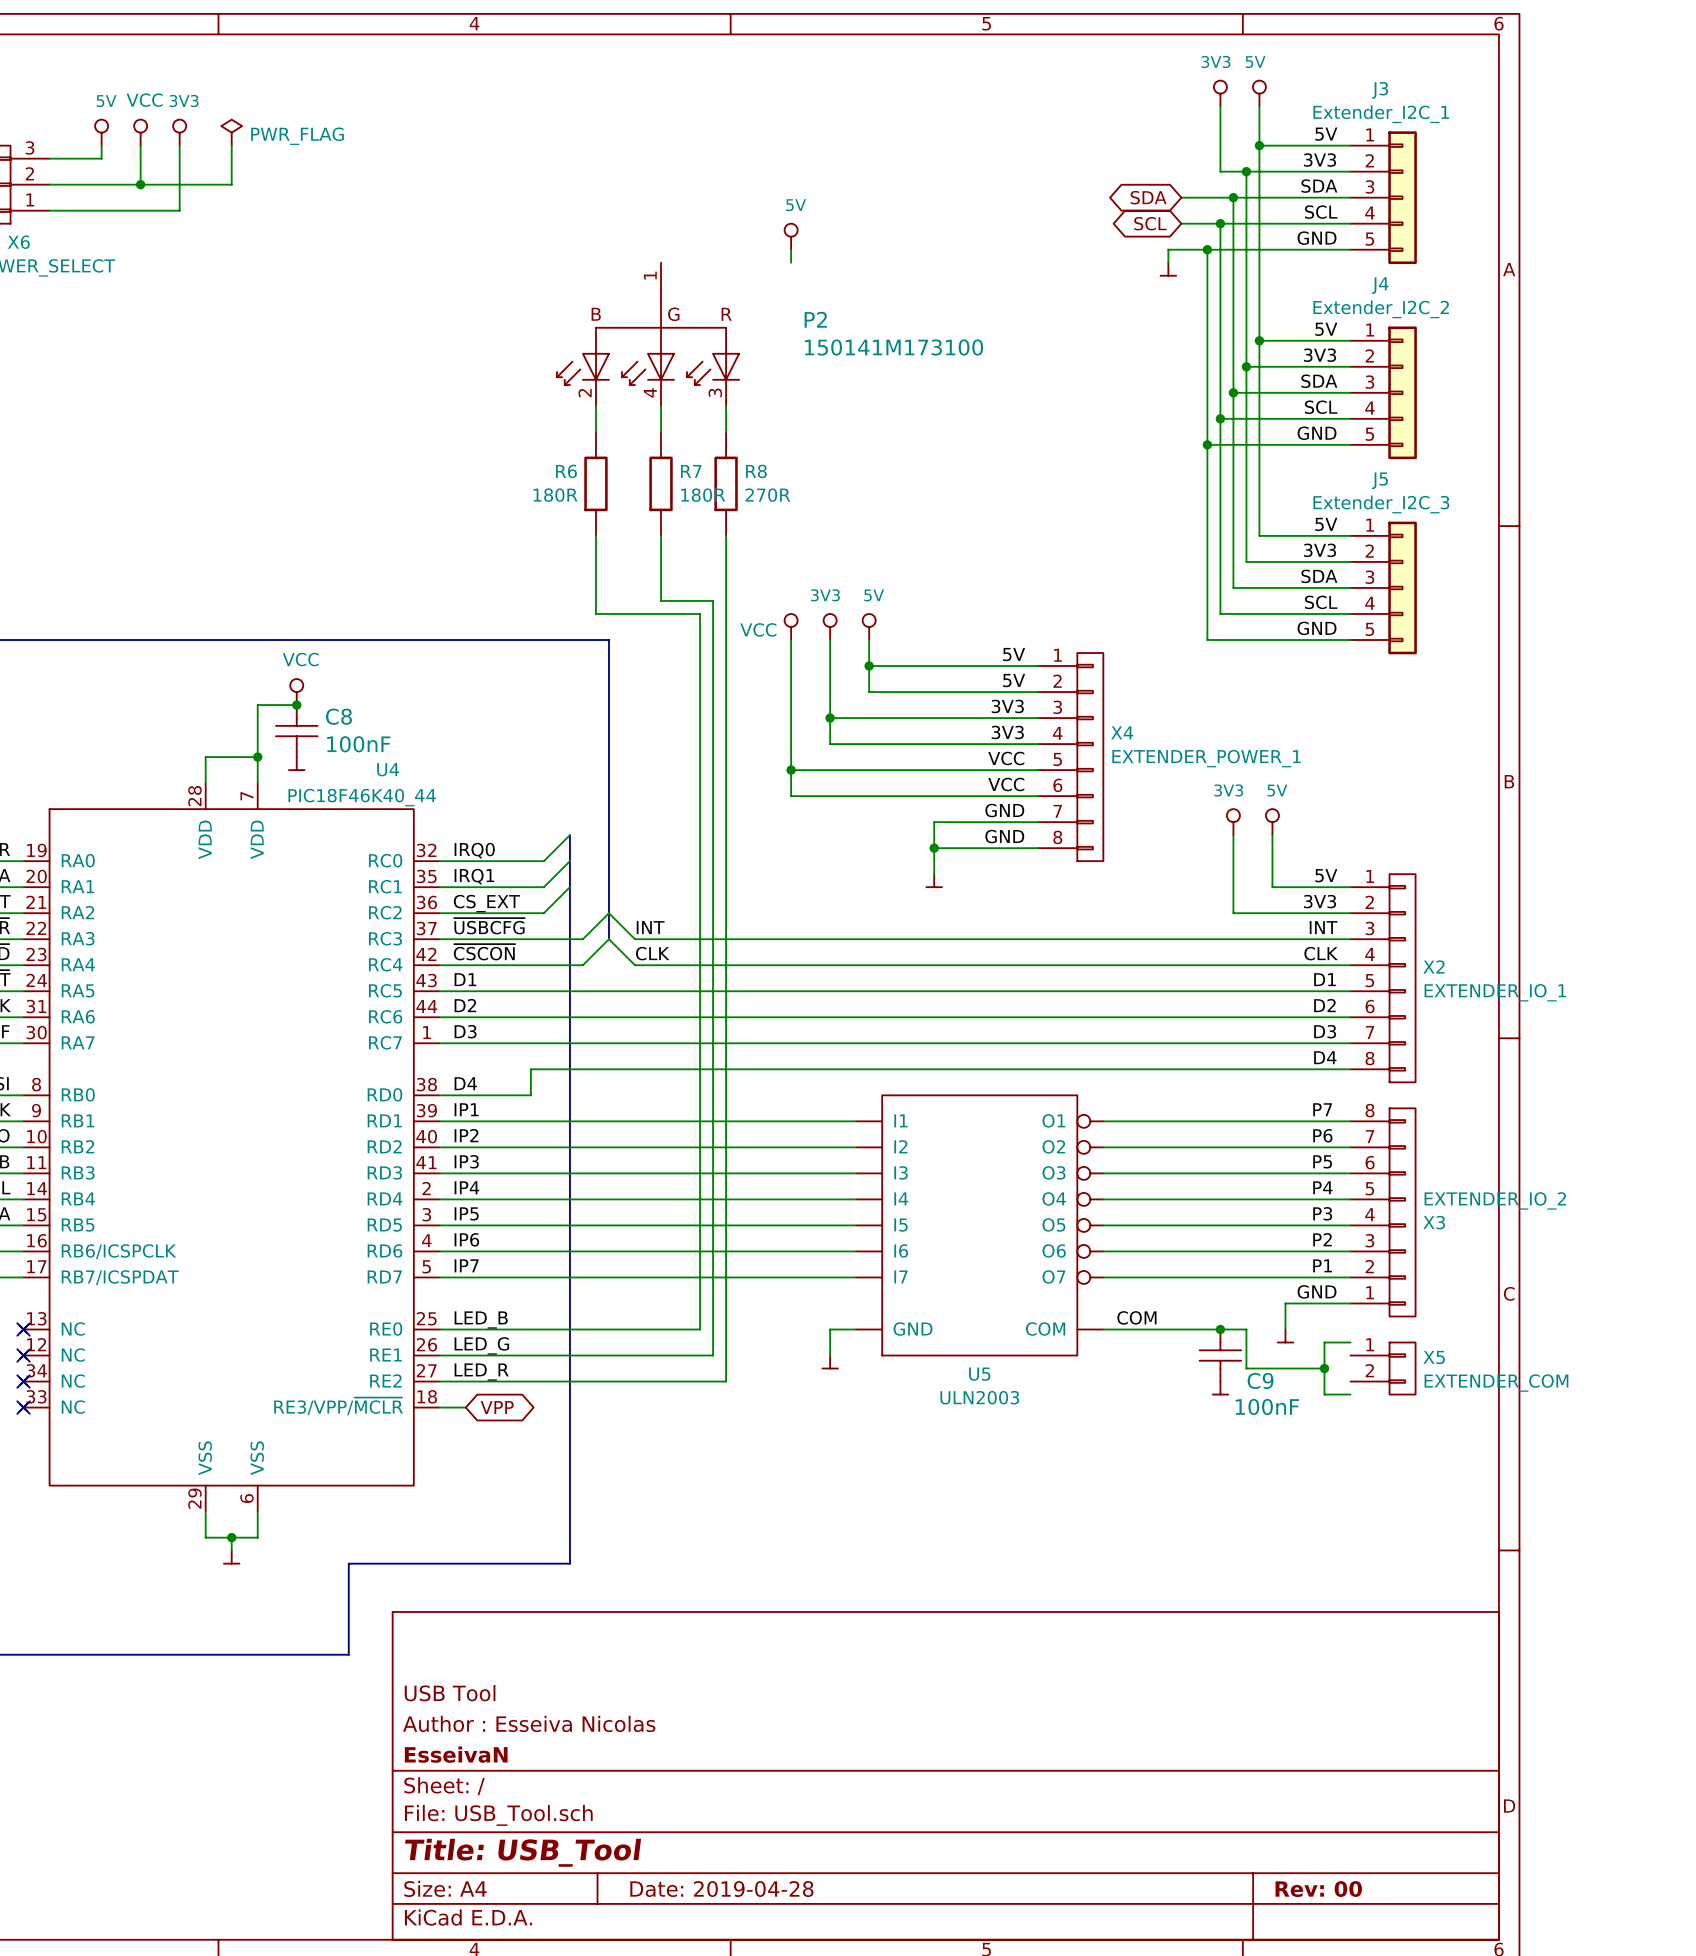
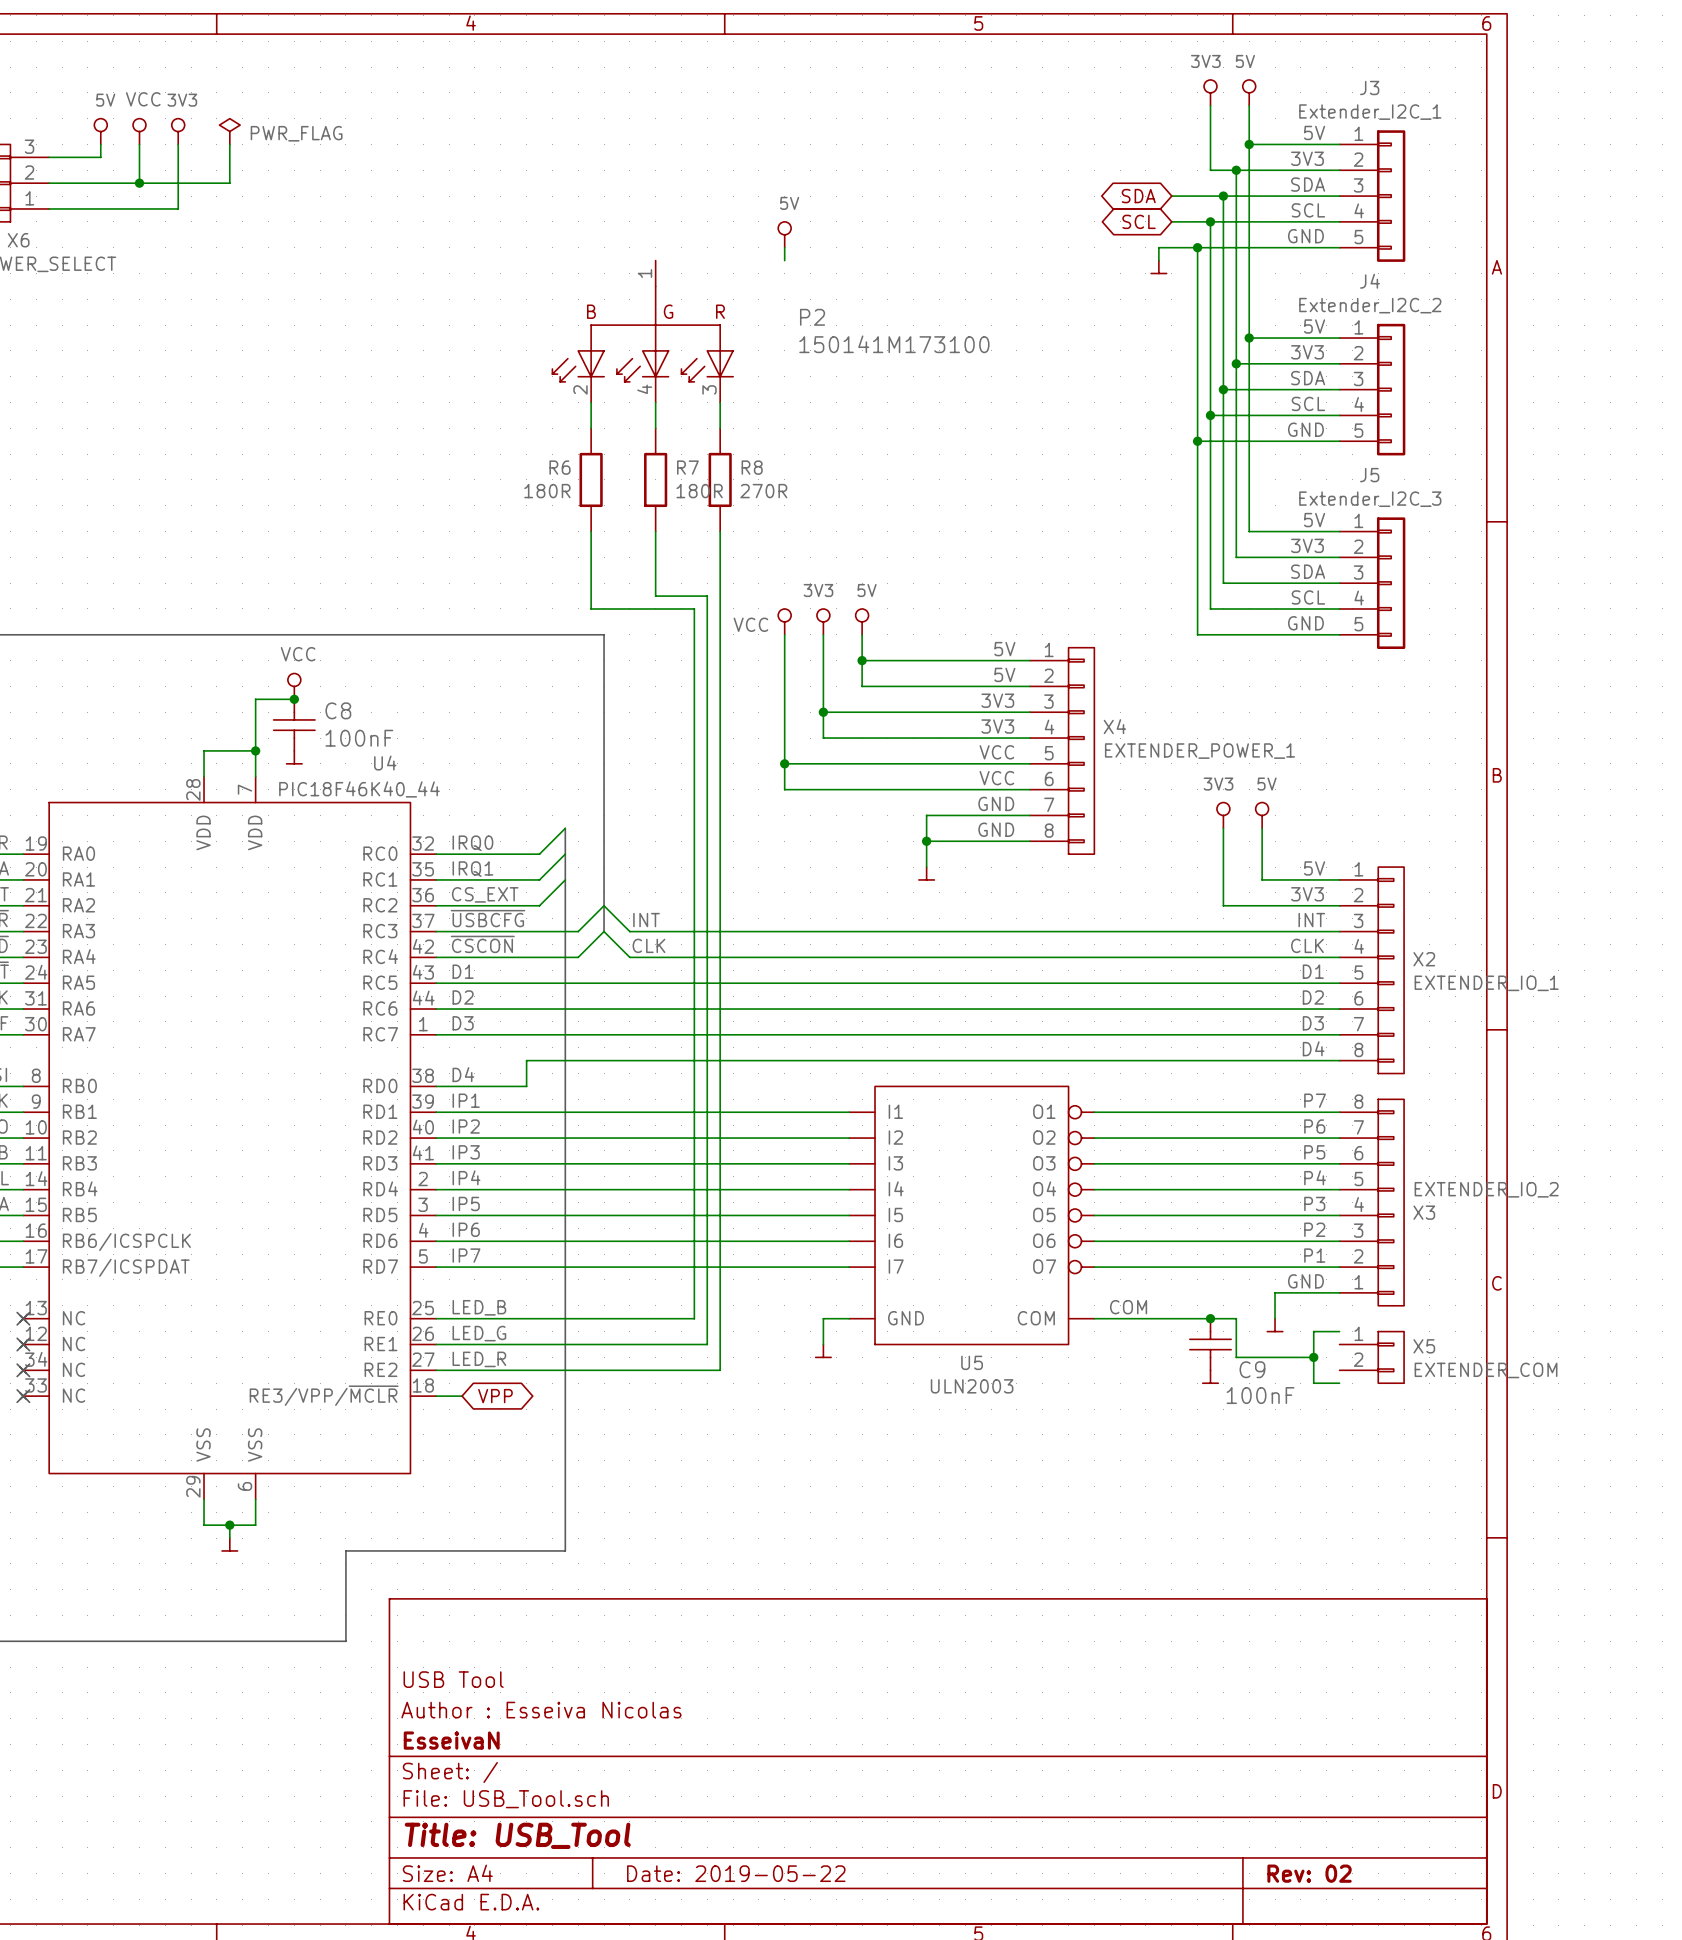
title block: Date: 2019-04-28 (721, 1889) -> Date: 2019-05-22 (736, 1873)
title block: Rev: 00 (1318, 1889) -> Rev: 02 (1309, 1873)

